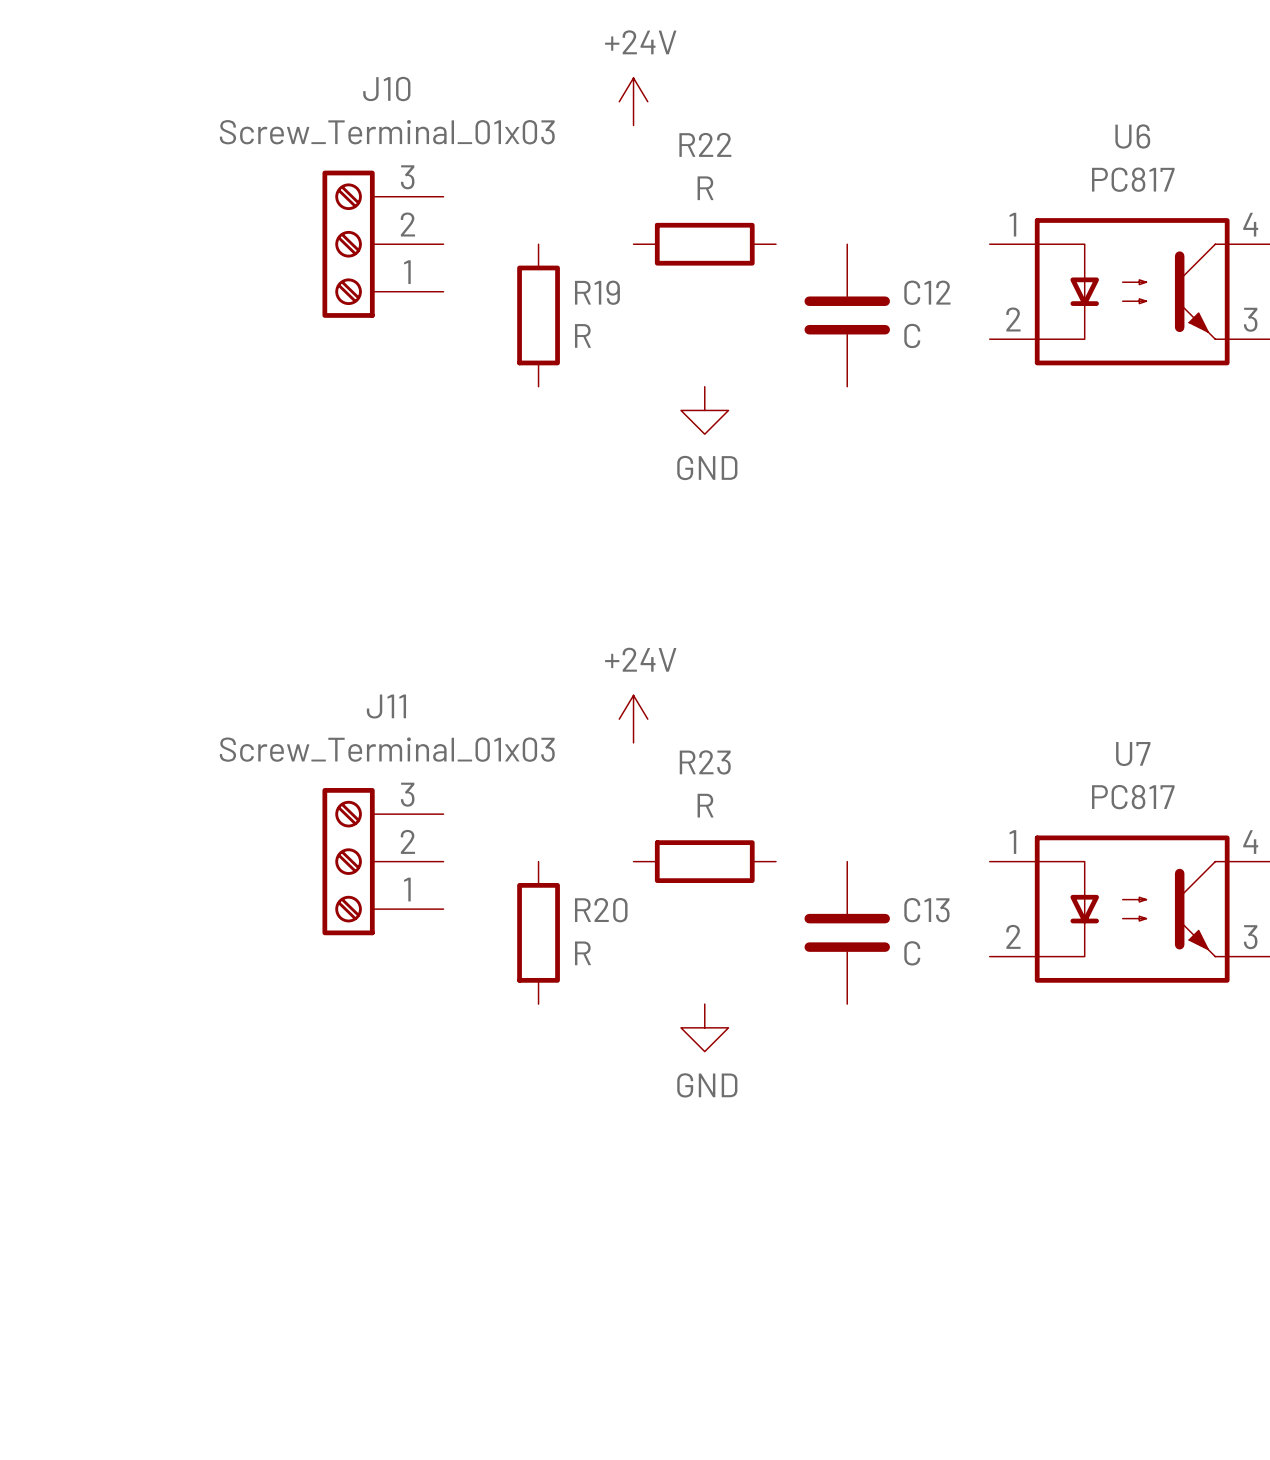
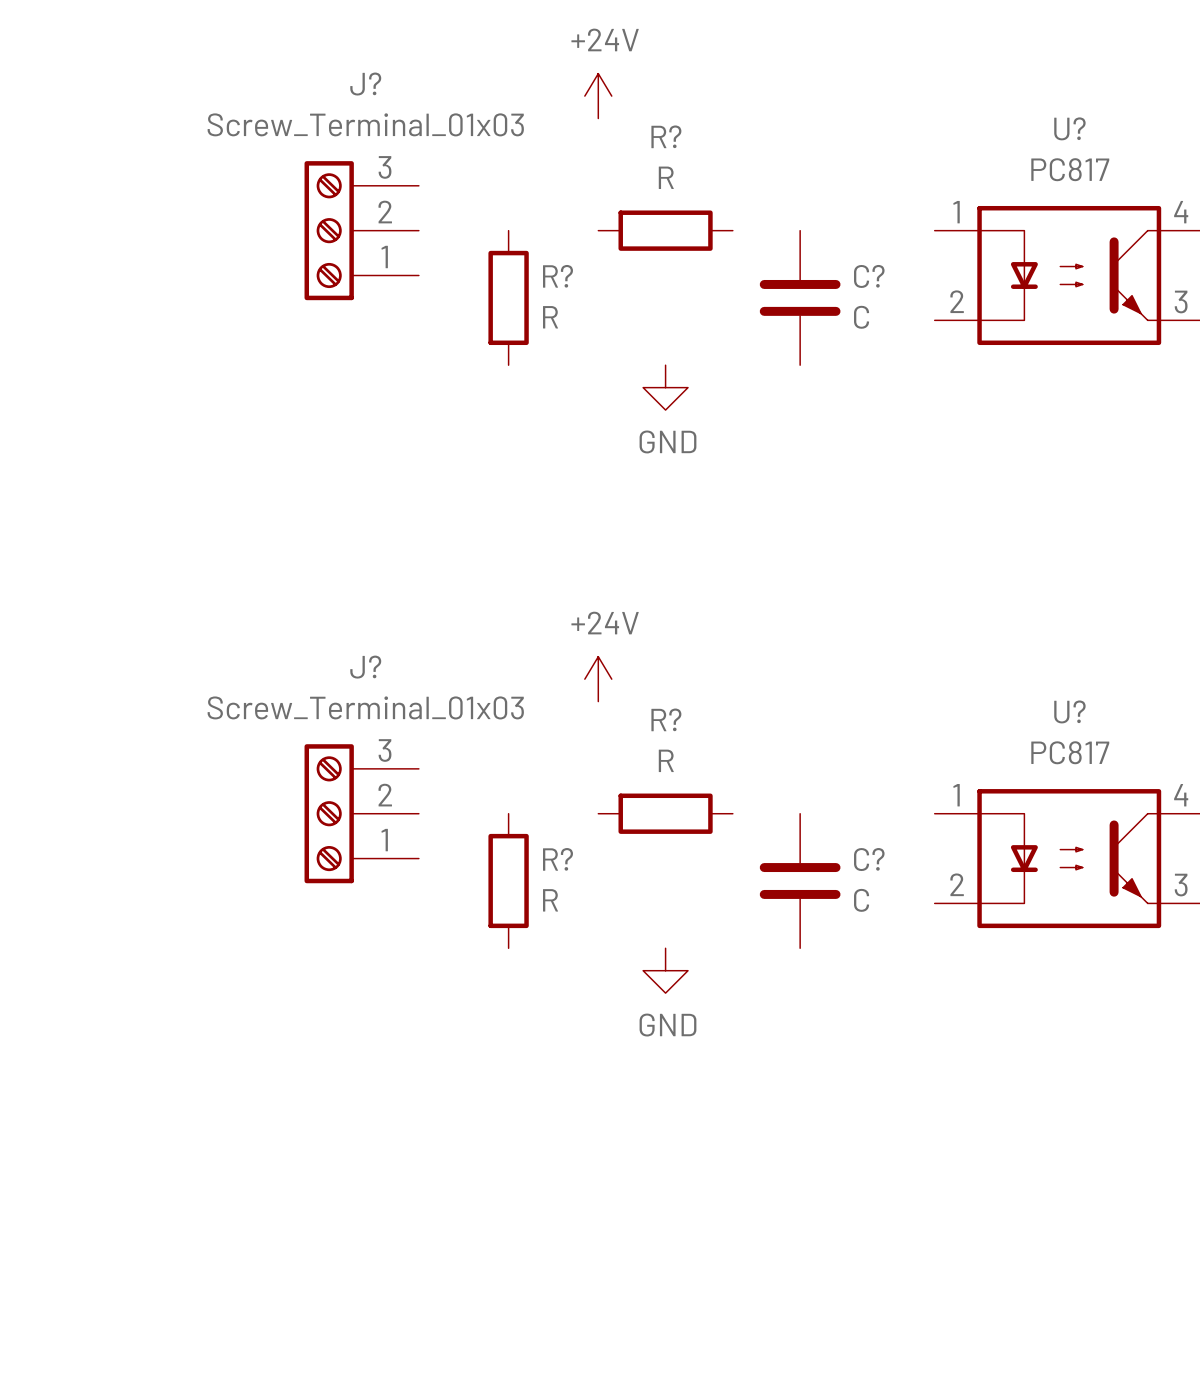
J10 name: J10 (386, 89) -> J? (365, 84)
U6 name: U6 (1132, 136) -> U? (1069, 128)
R22 name: R22 (705, 144) -> R? (666, 136)
R19 name: R19 (597, 292) -> R? (558, 276)
C12 name: C12 (927, 292) -> C? (869, 276)
J11 name: J11 (386, 706) -> J? (365, 667)
U7 name: U7 (1133, 754) -> U? (1069, 711)
R23 name: R23 (705, 762) -> R? (666, 719)
R20 name: R20 (601, 910) -> R? (558, 859)
C13 name: C13 (926, 910) -> C? (869, 859)

